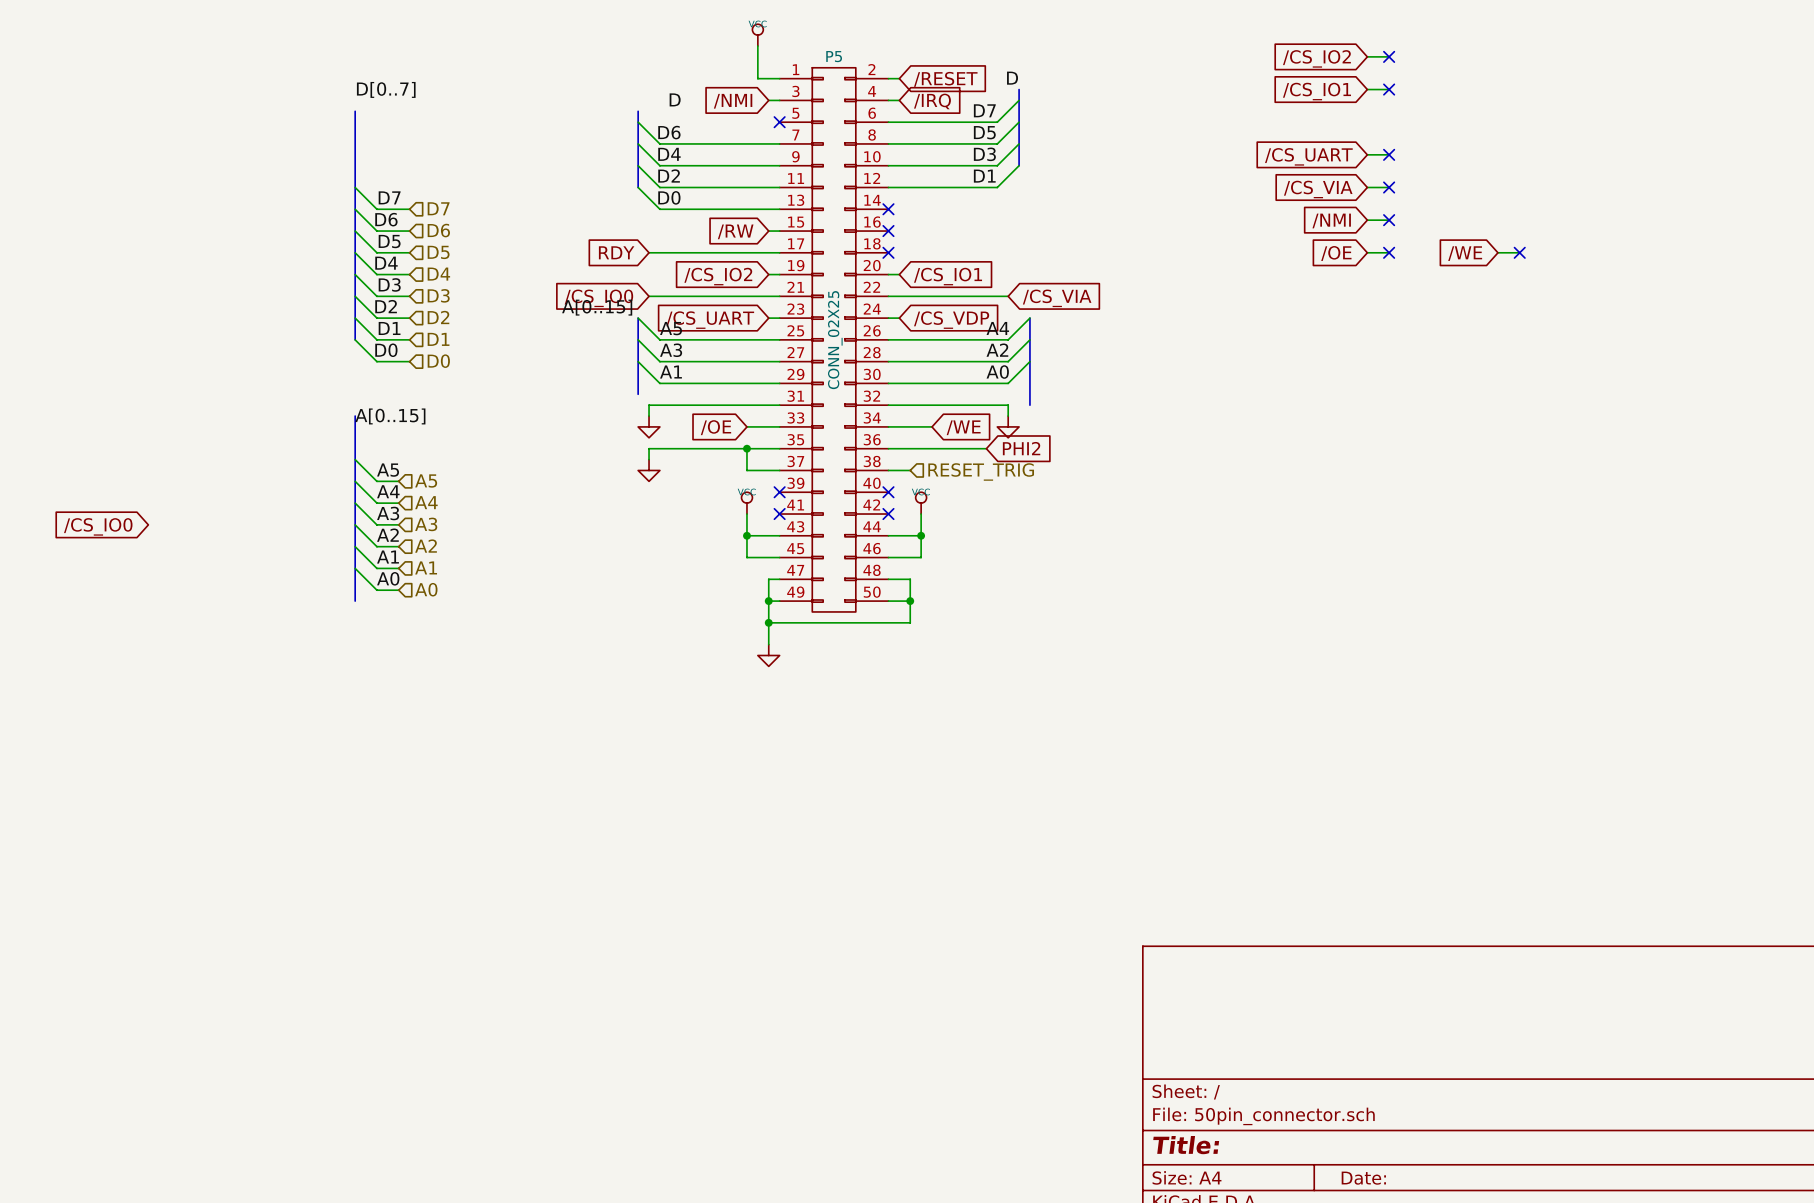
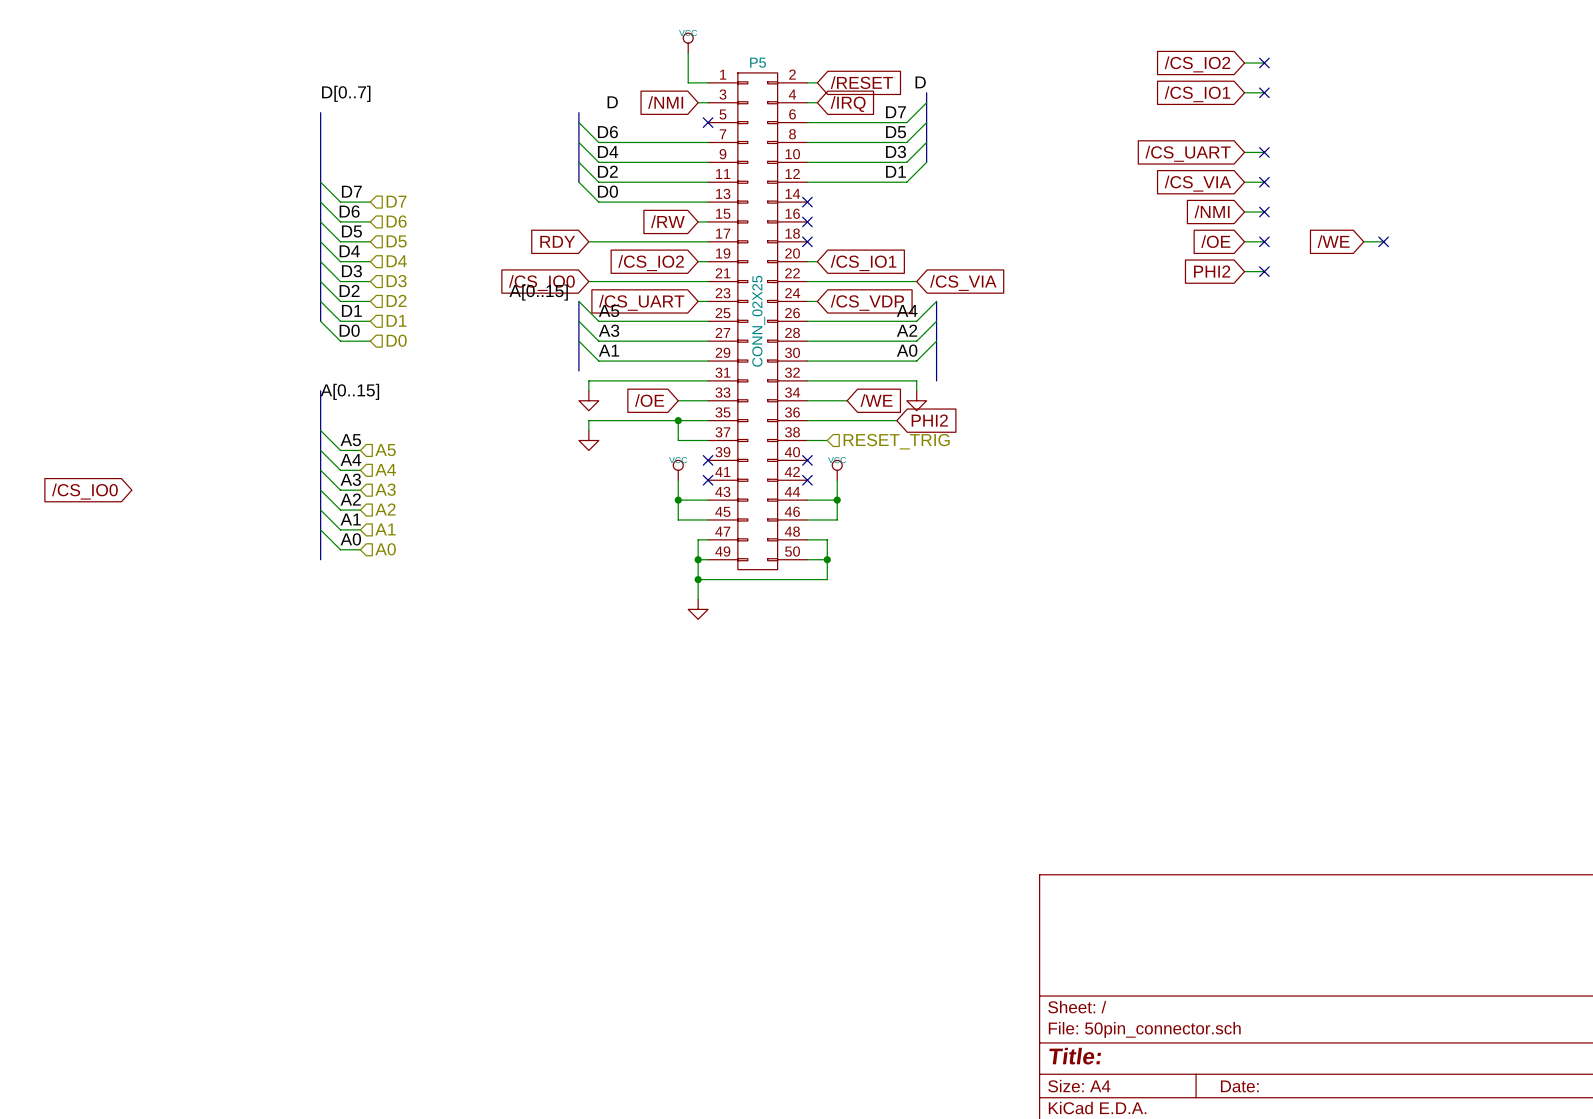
global label: none -> PHI2 (1212, 271)
wire: none -> (1244, 271) (1264, 271)
no-connect mark: none -> (1264, 271)

